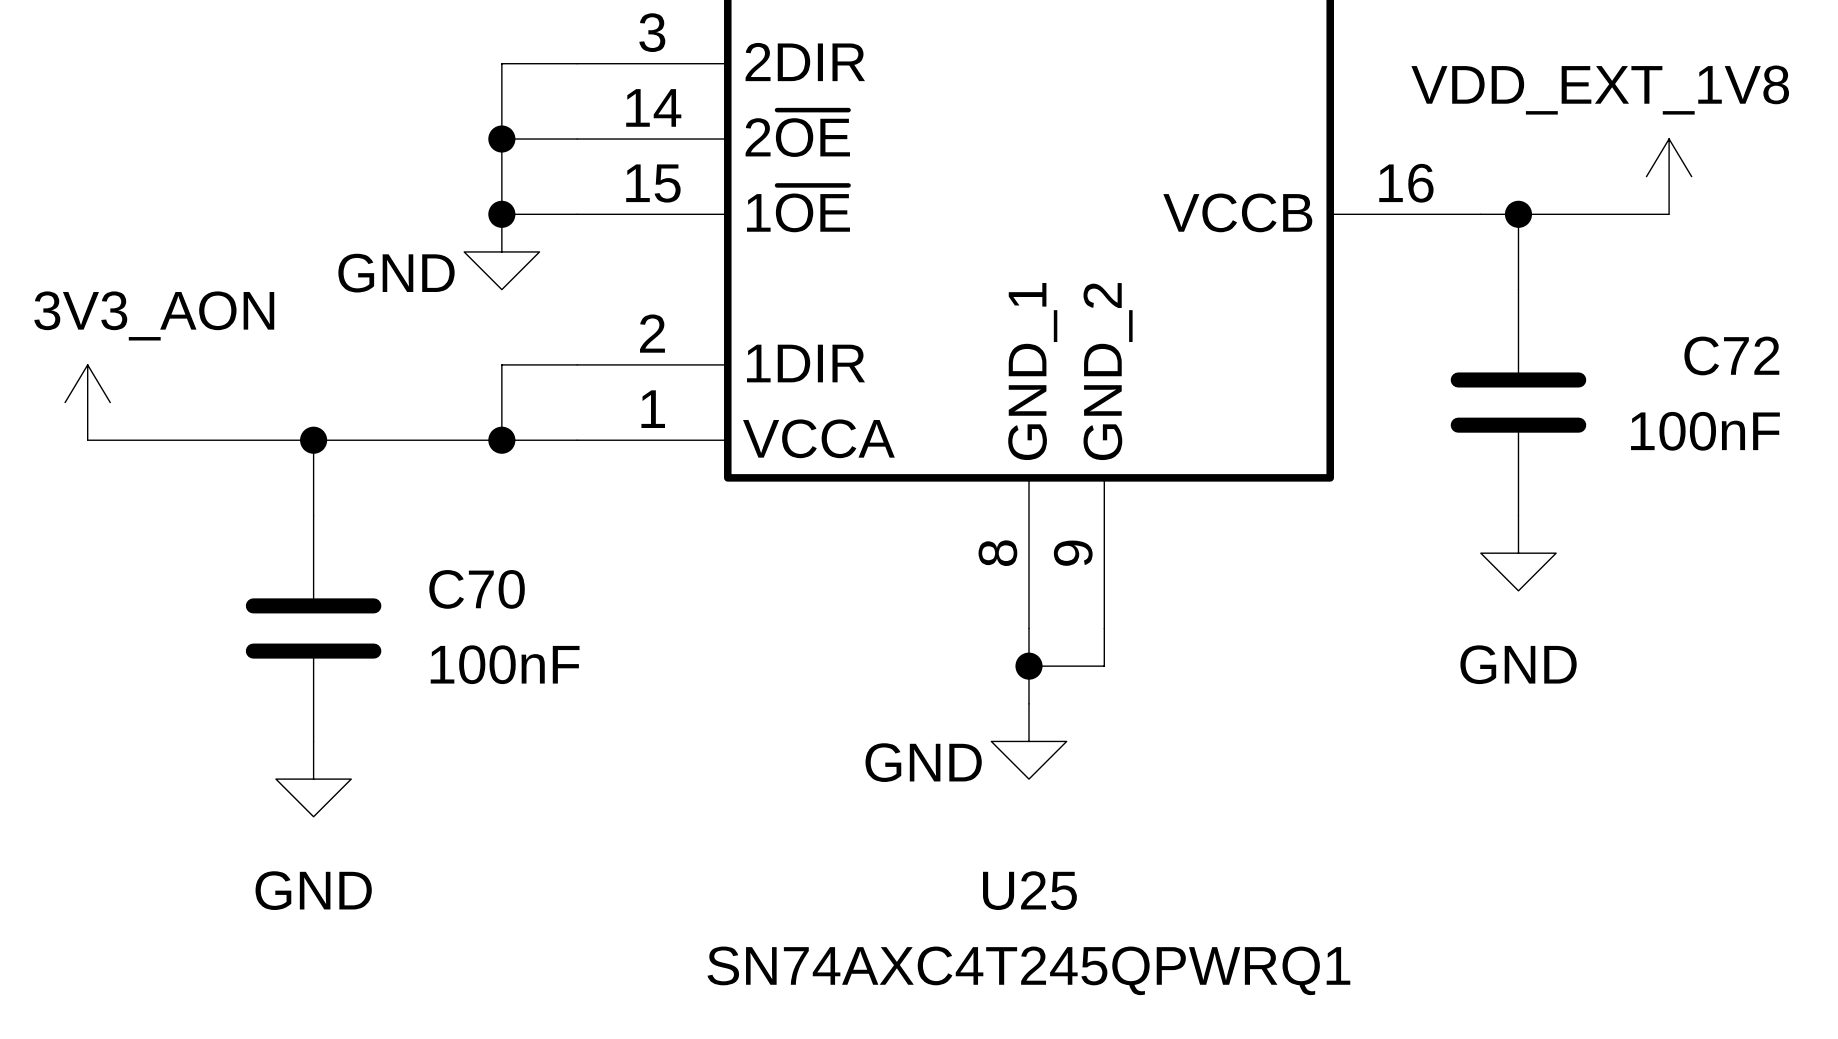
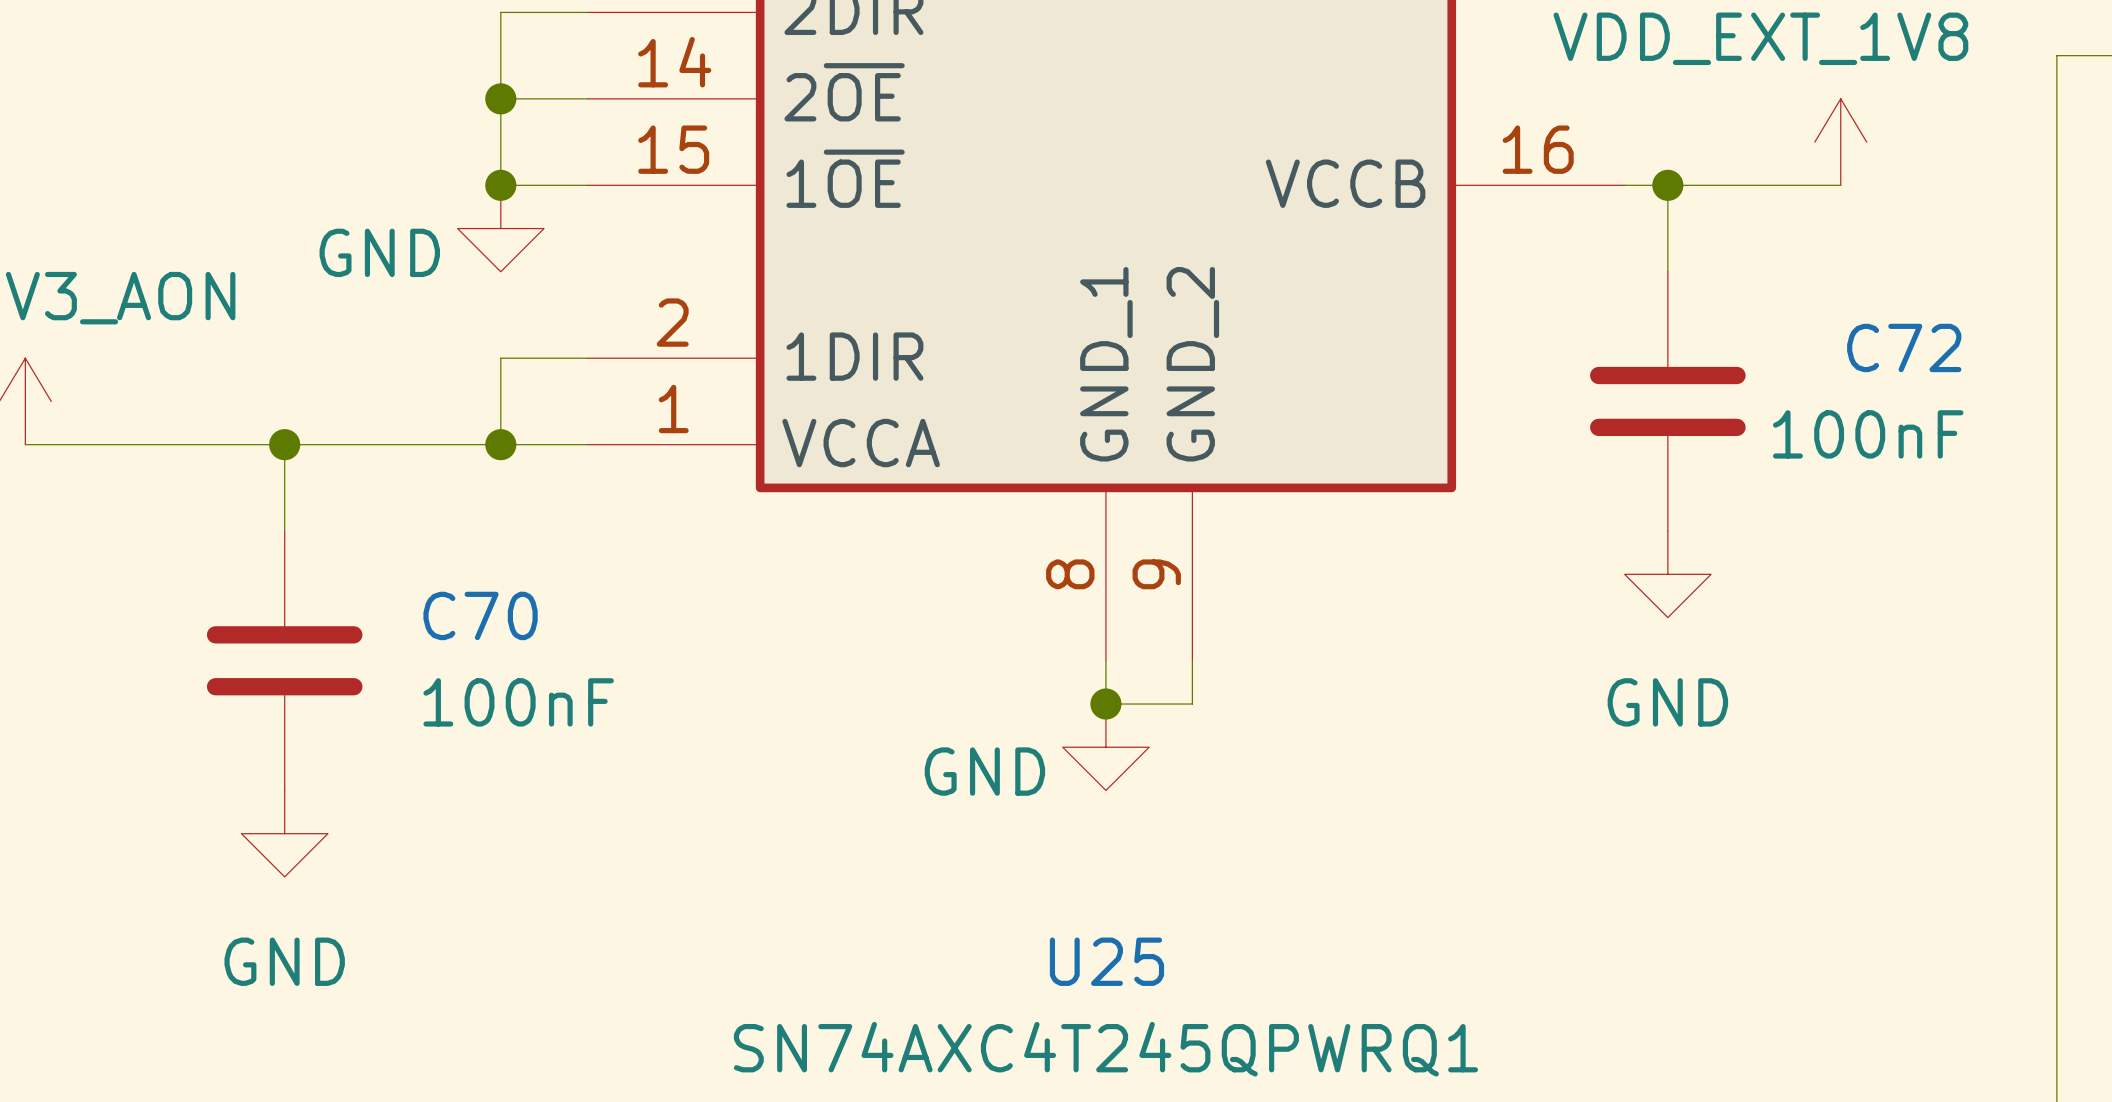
power symbol position: GND (1029, 741) -> GND (1105, 747)

